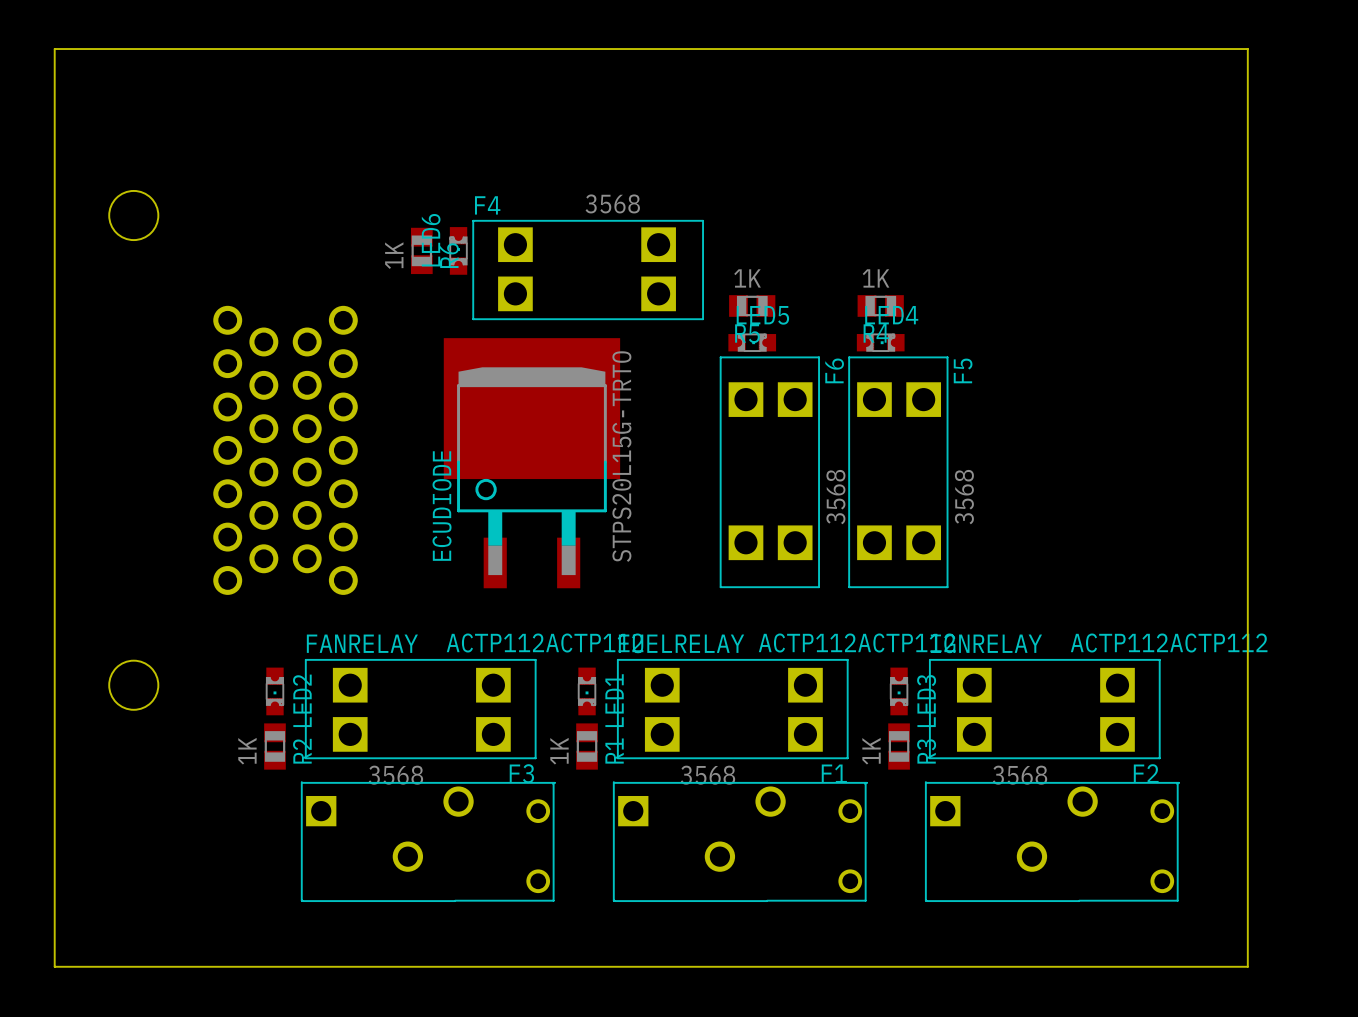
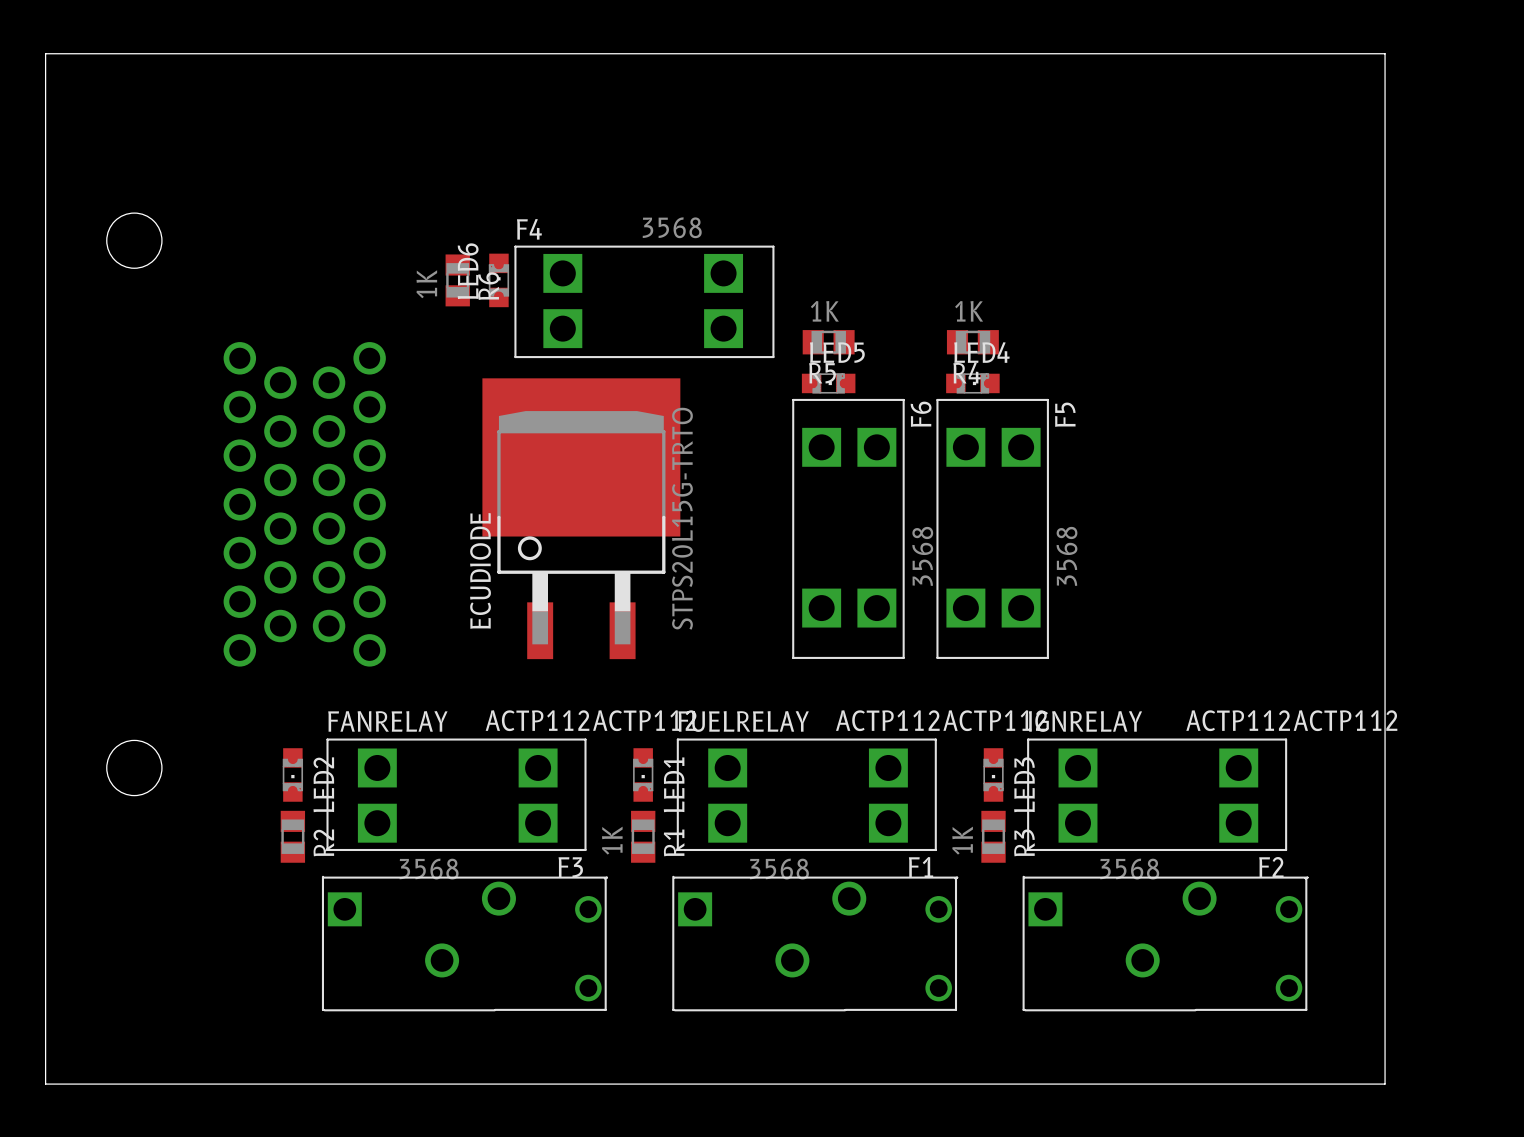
R2 value: 1K (247, 751) -> none

